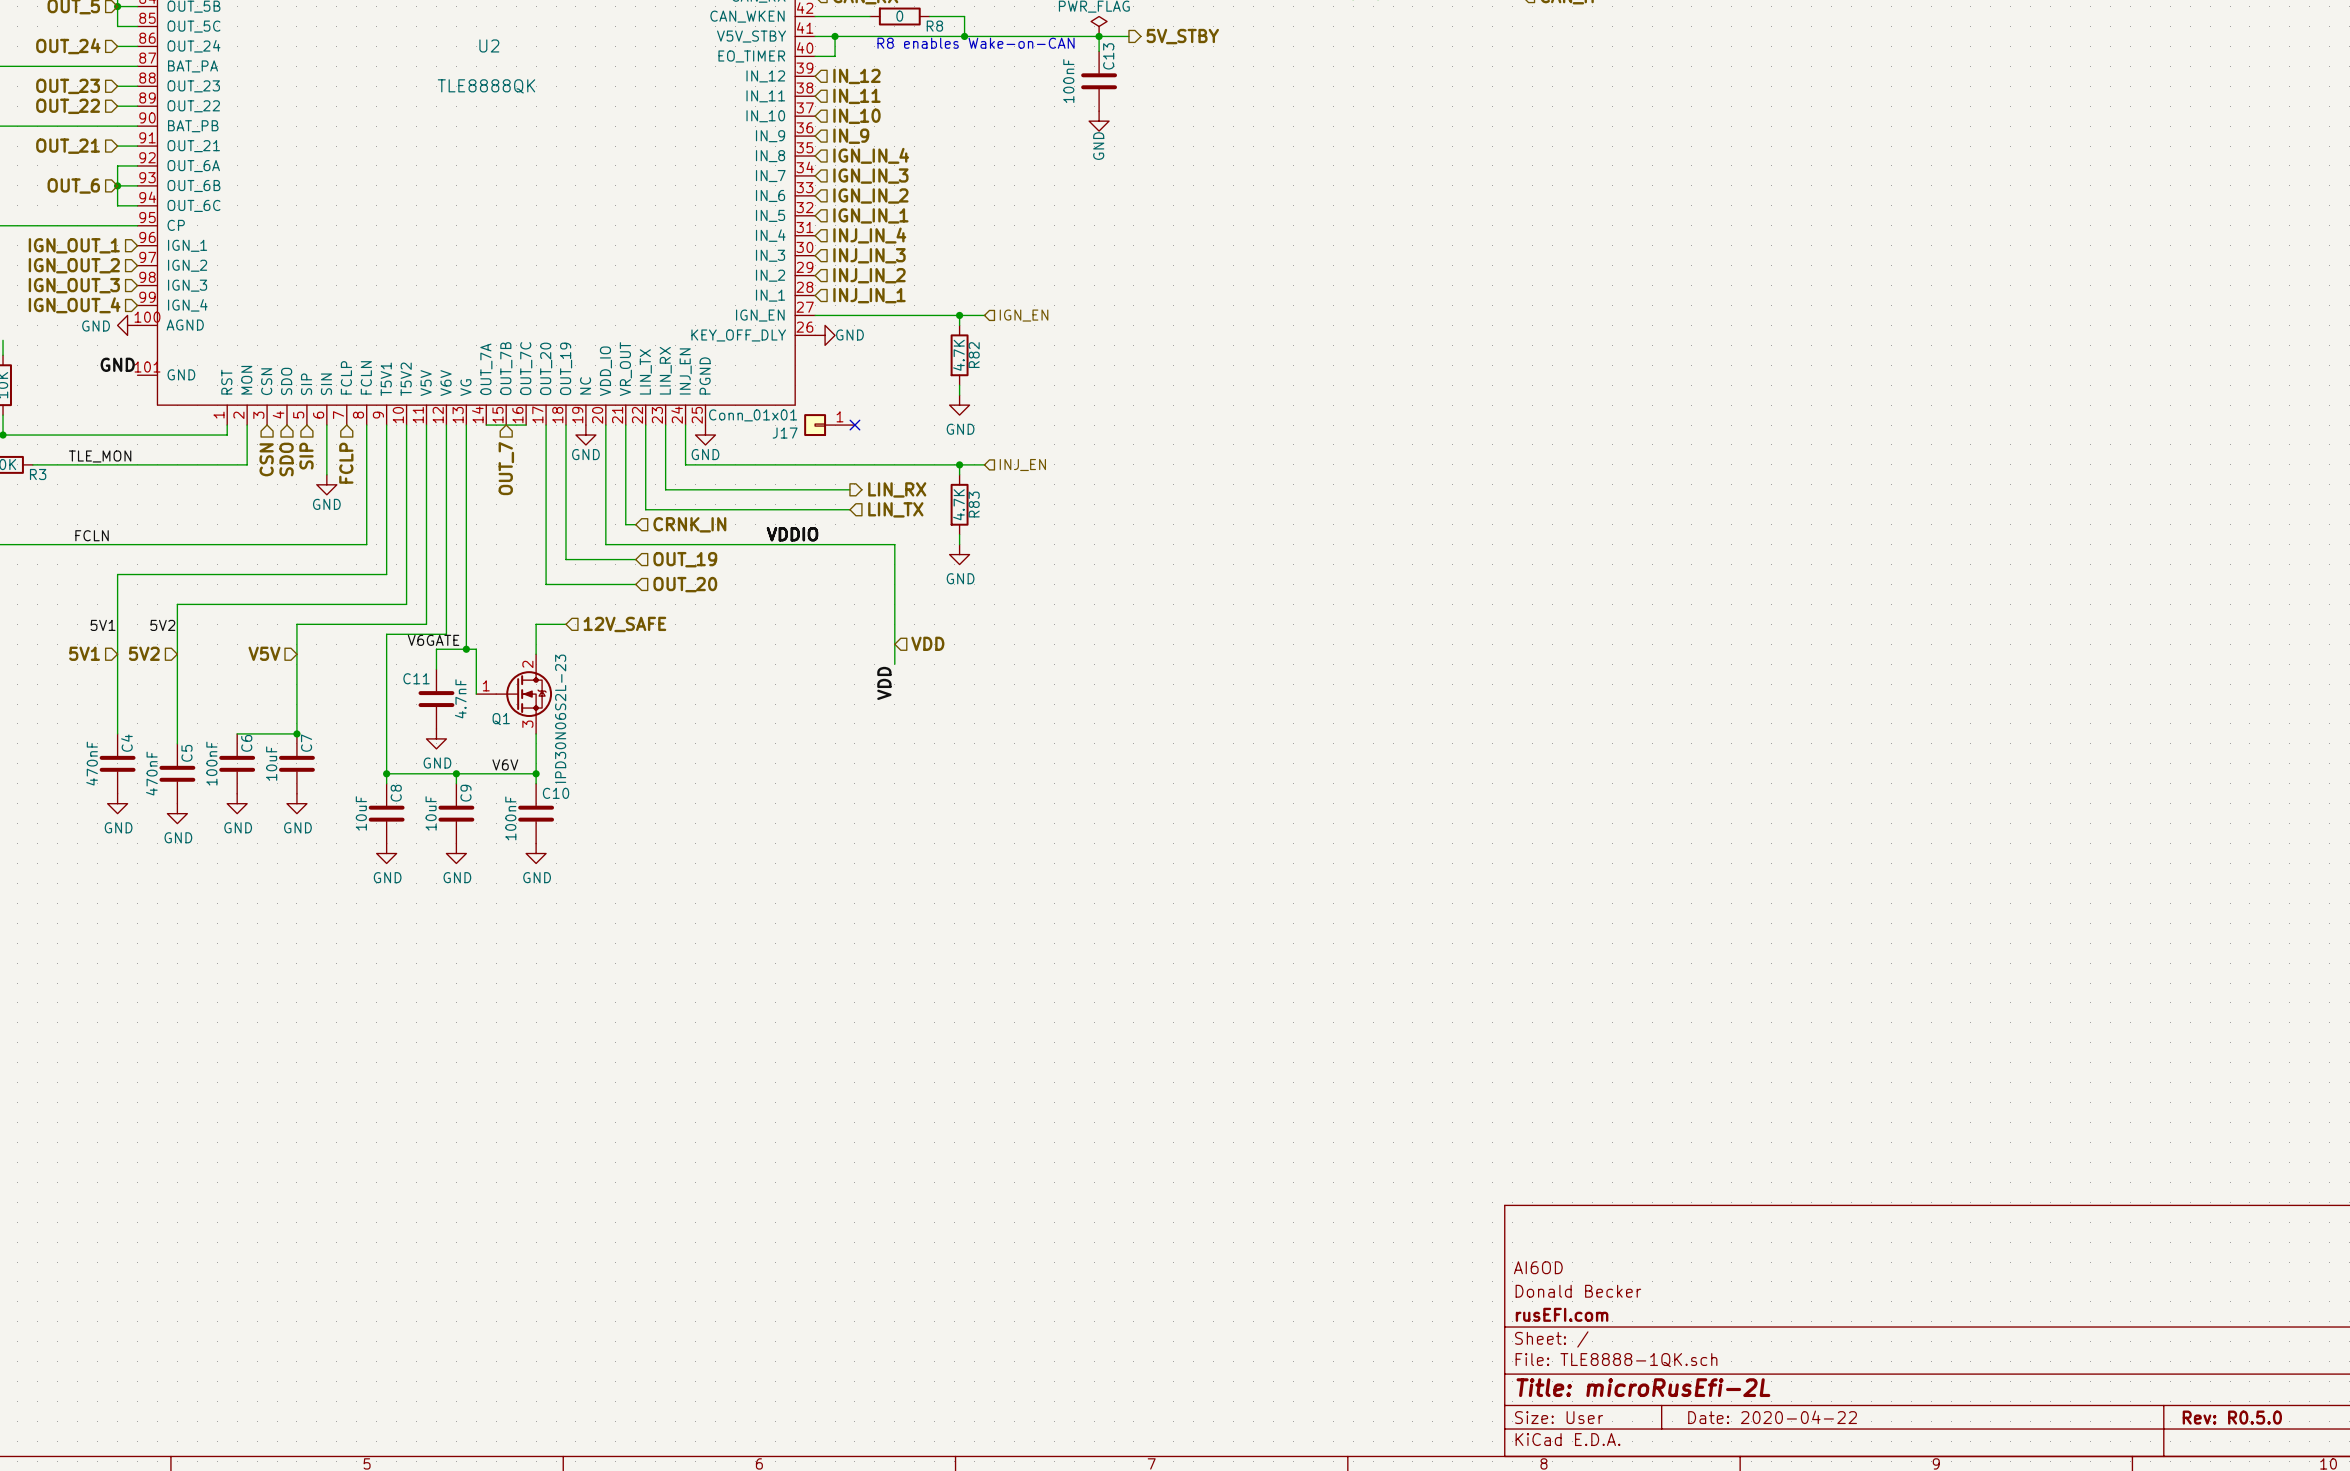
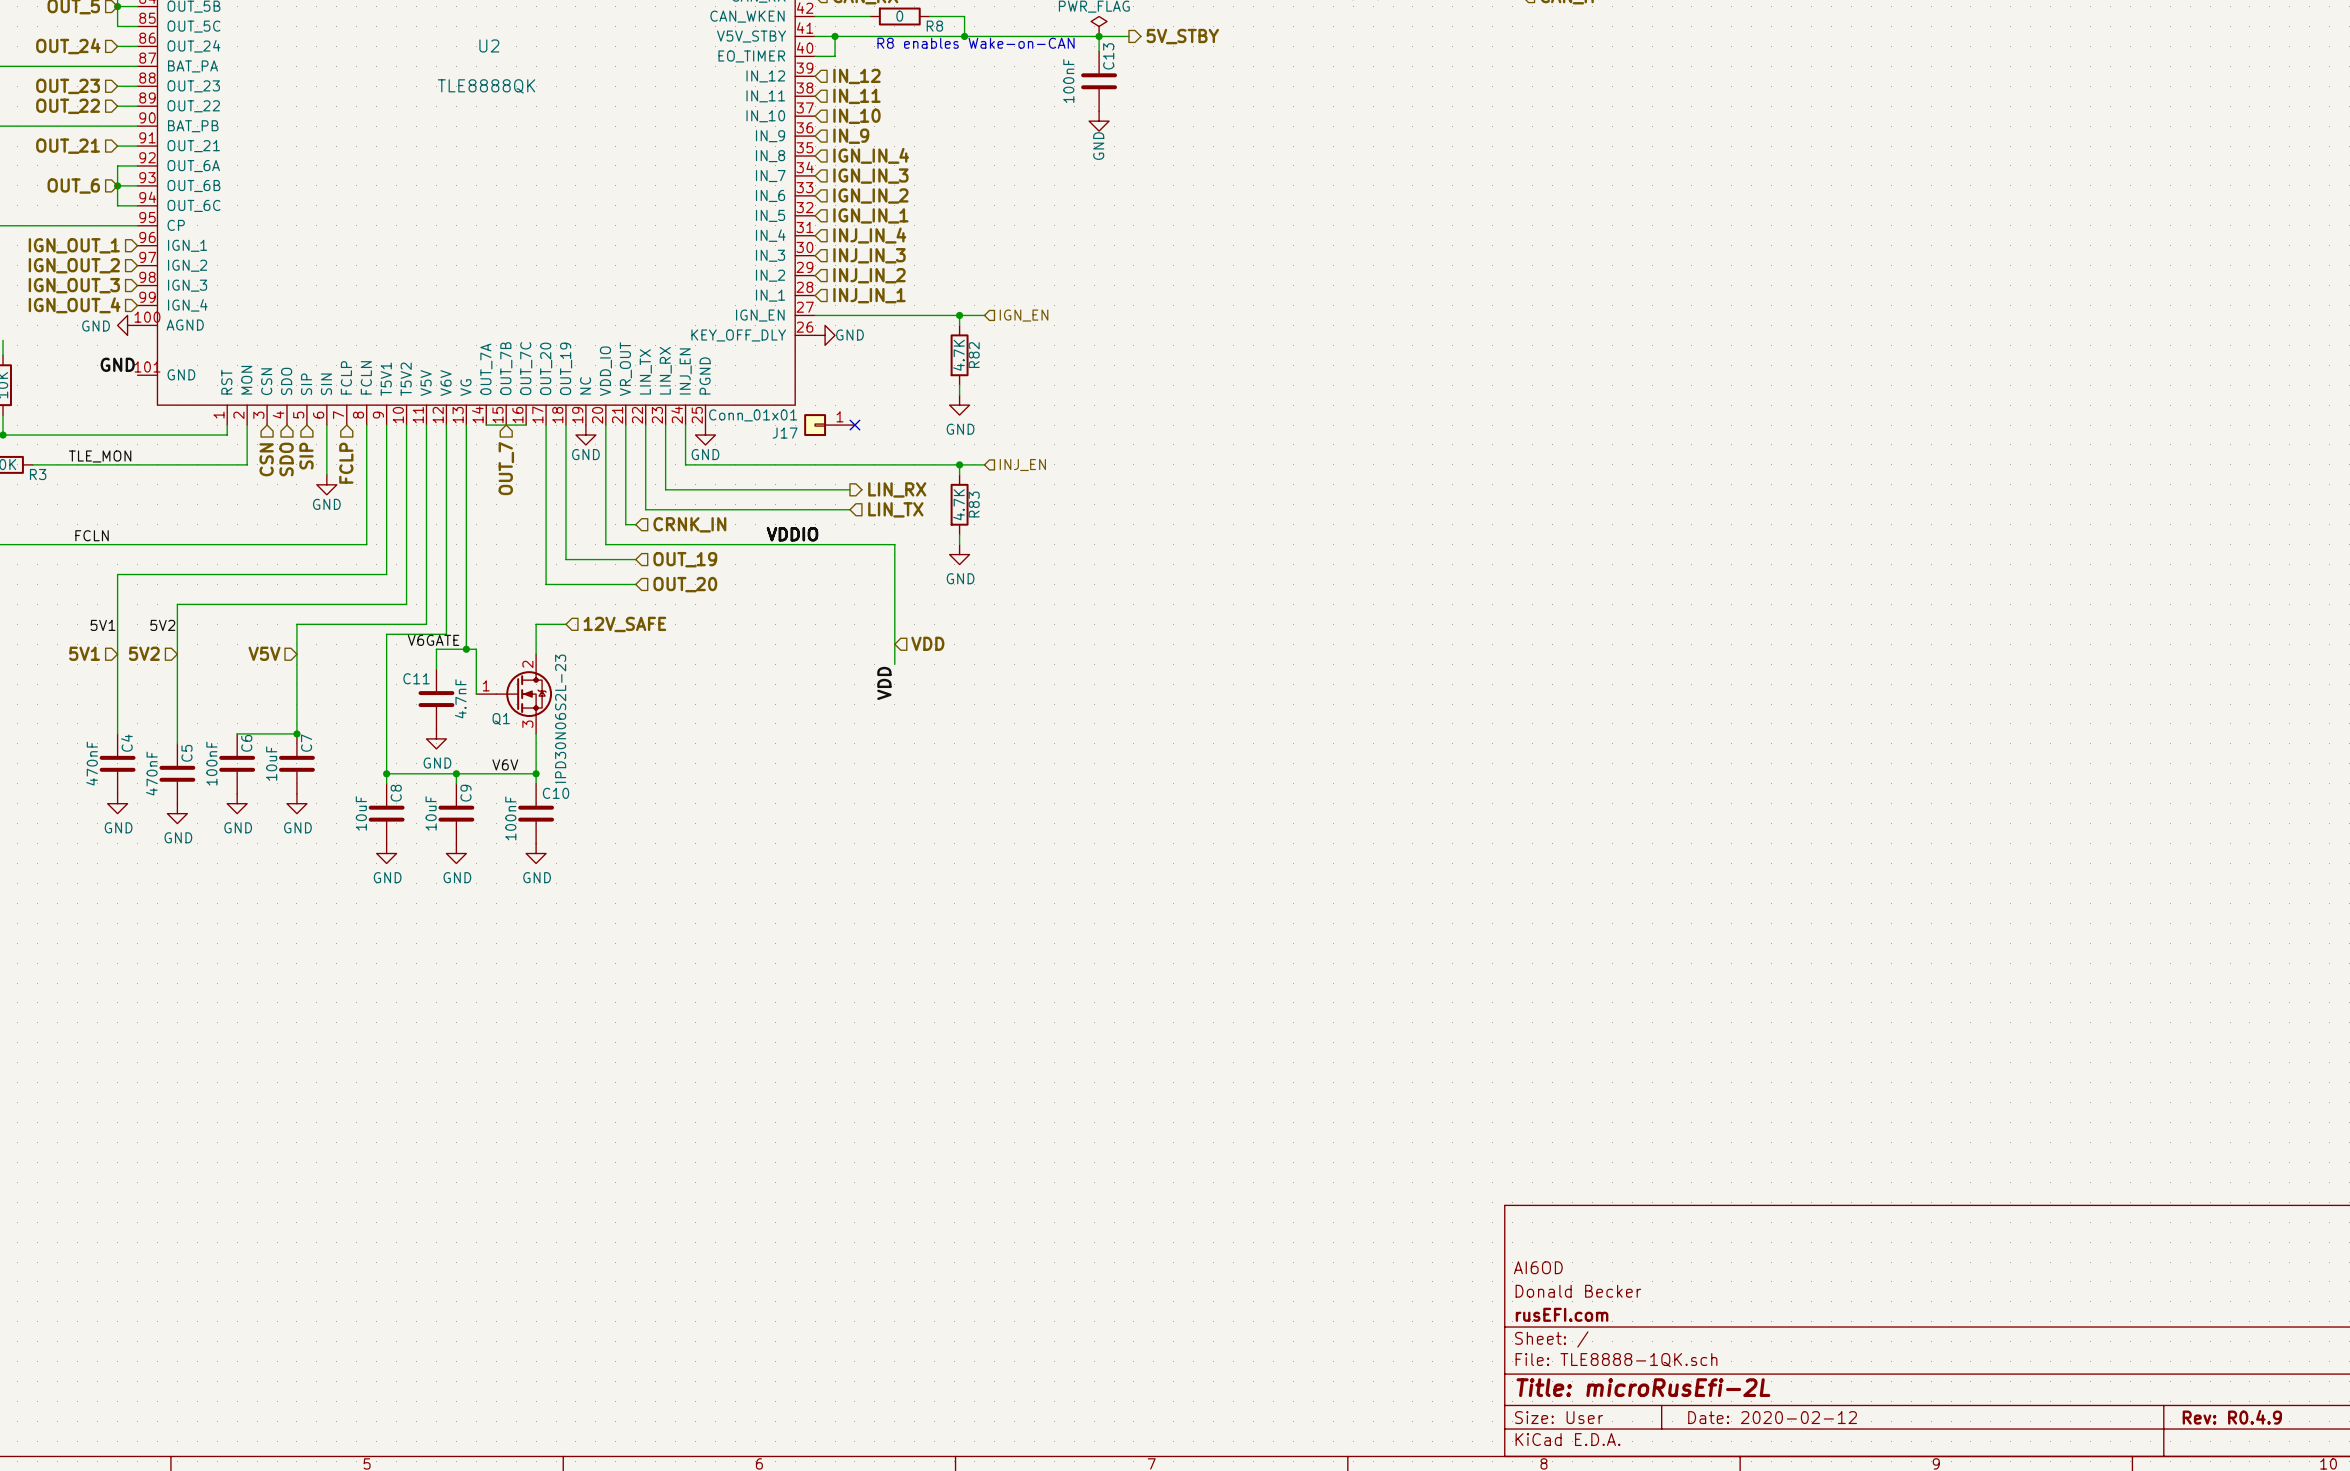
title block: Date: 2020-04-22 (1772, 1417) -> Date: 2020-02-12 (1772, 1417)
title block: Rev: R0.5.0 (2232, 1417) -> Rev: R0.4.9 (2232, 1417)

